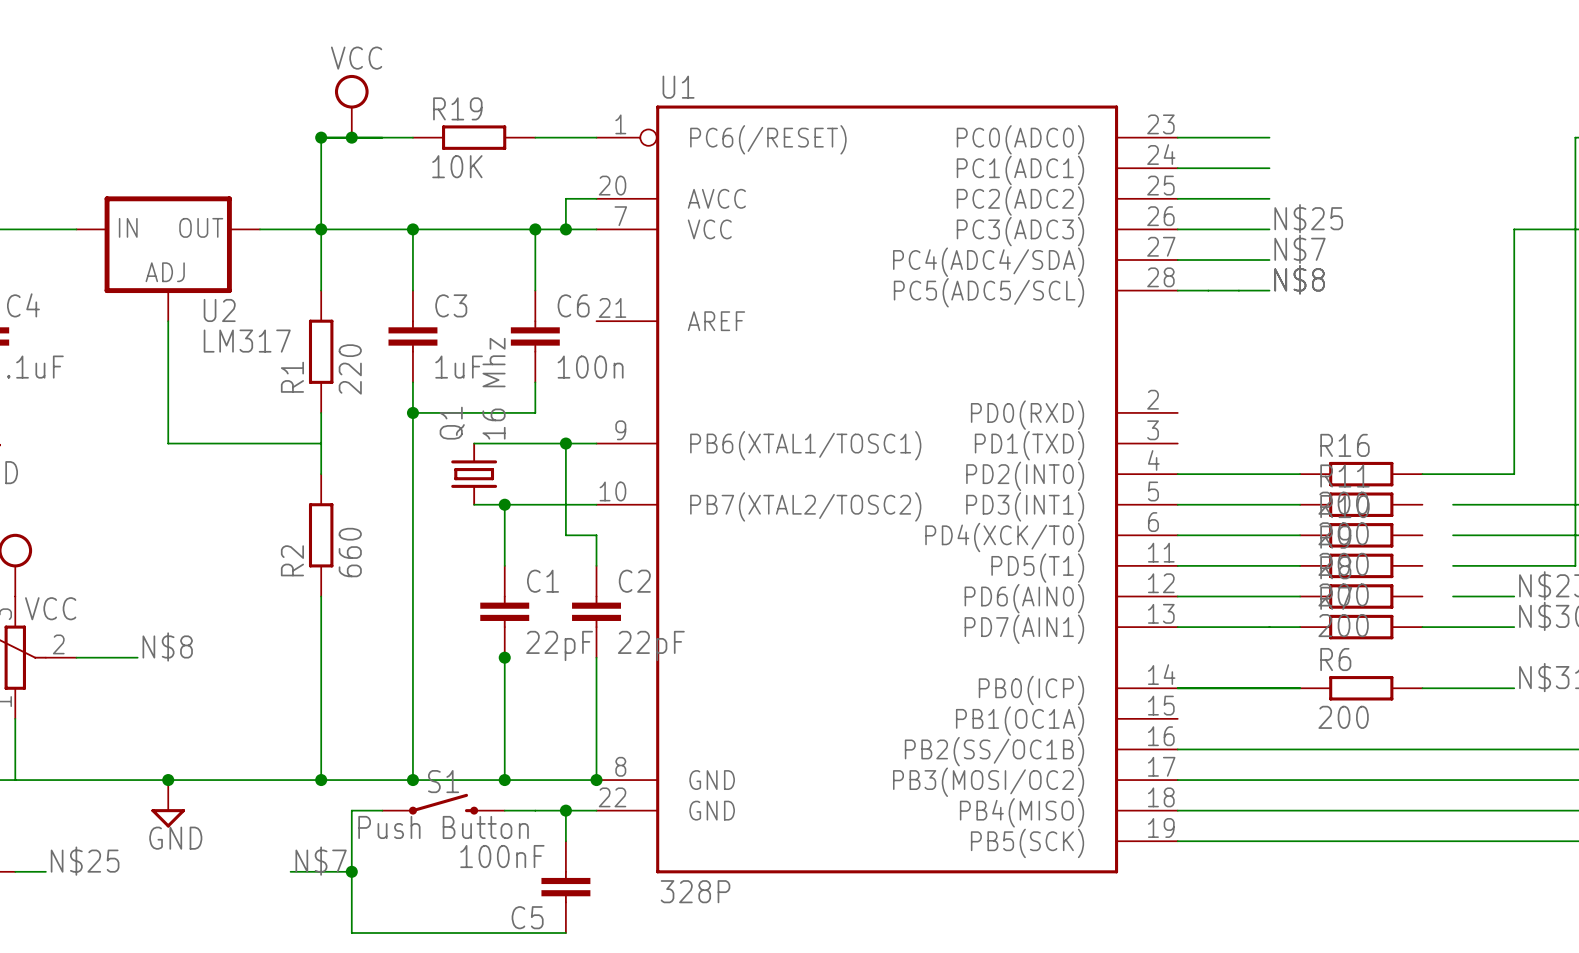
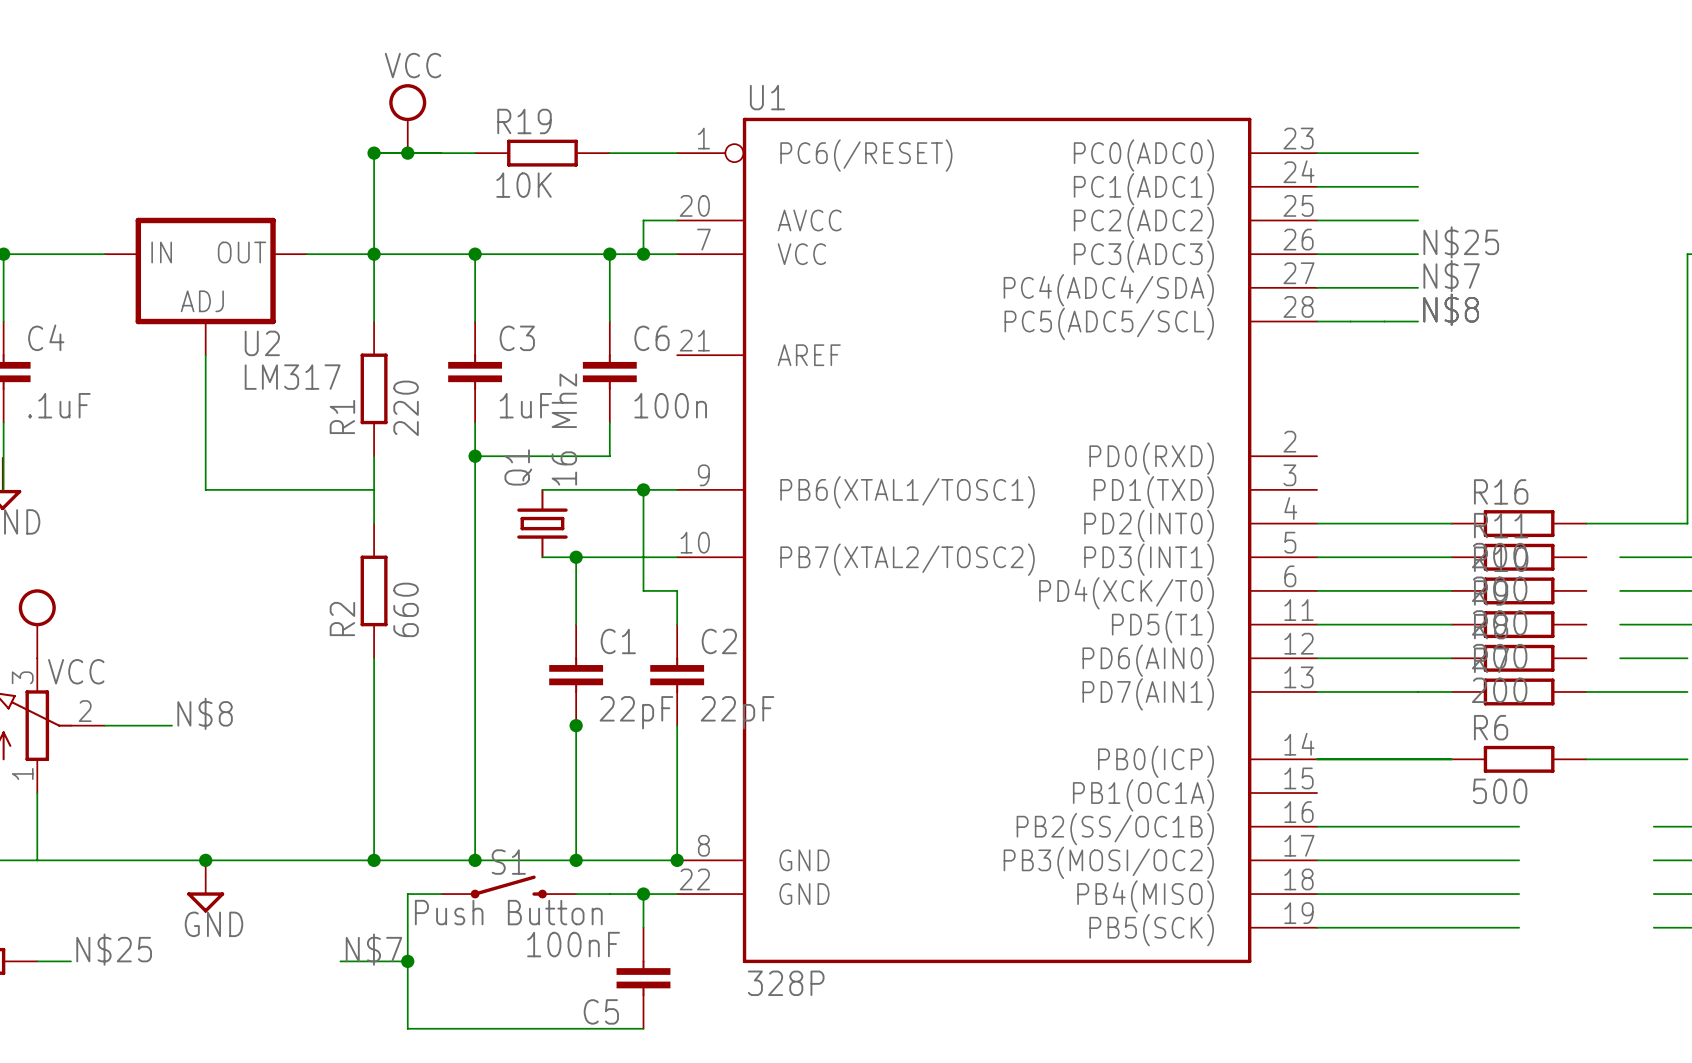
R6 value: 200 (1343, 717) -> 500 (1500, 791)
wire: (1361, 749) (1483, 749) -> none
wire: (1361, 780) (1483, 780) -> none
wire: (1361, 810) (1483, 810) -> none
wire: (1361, 841) (1483, 841) -> none

